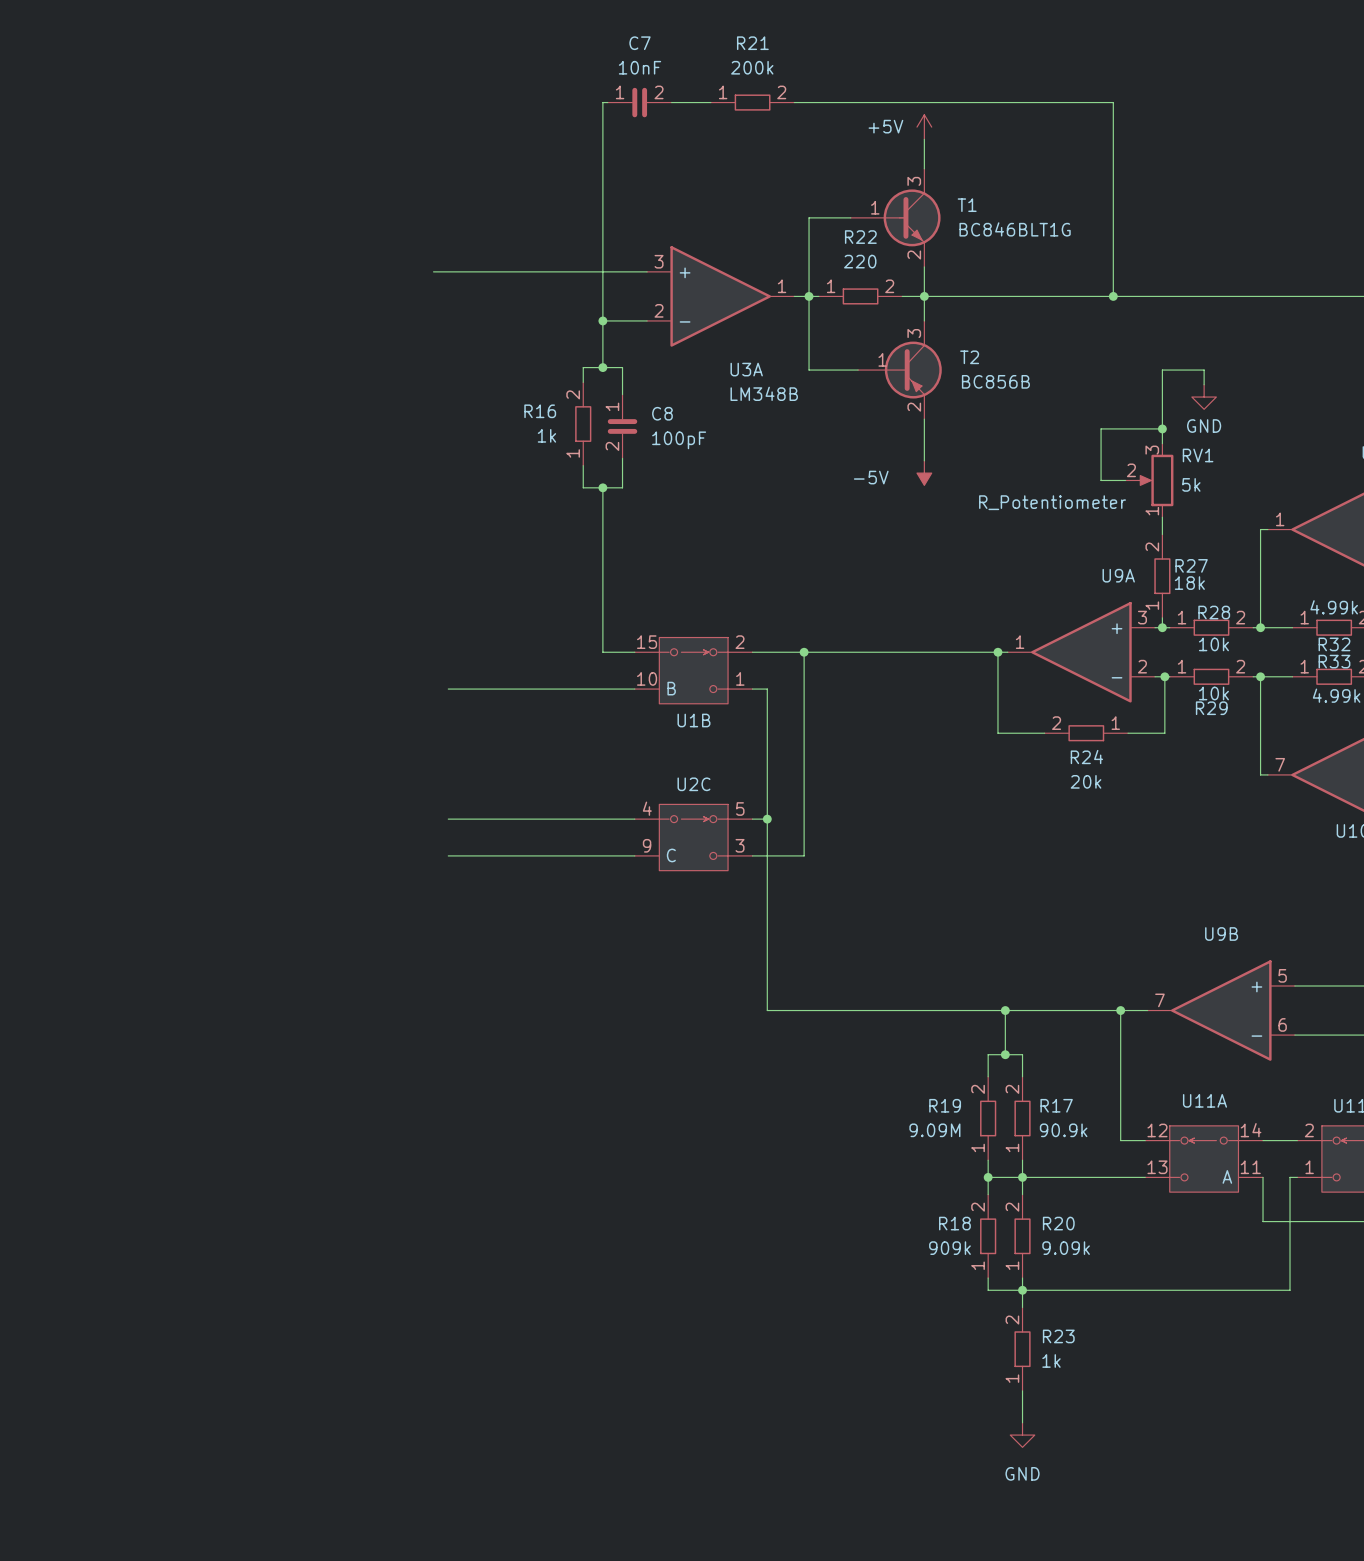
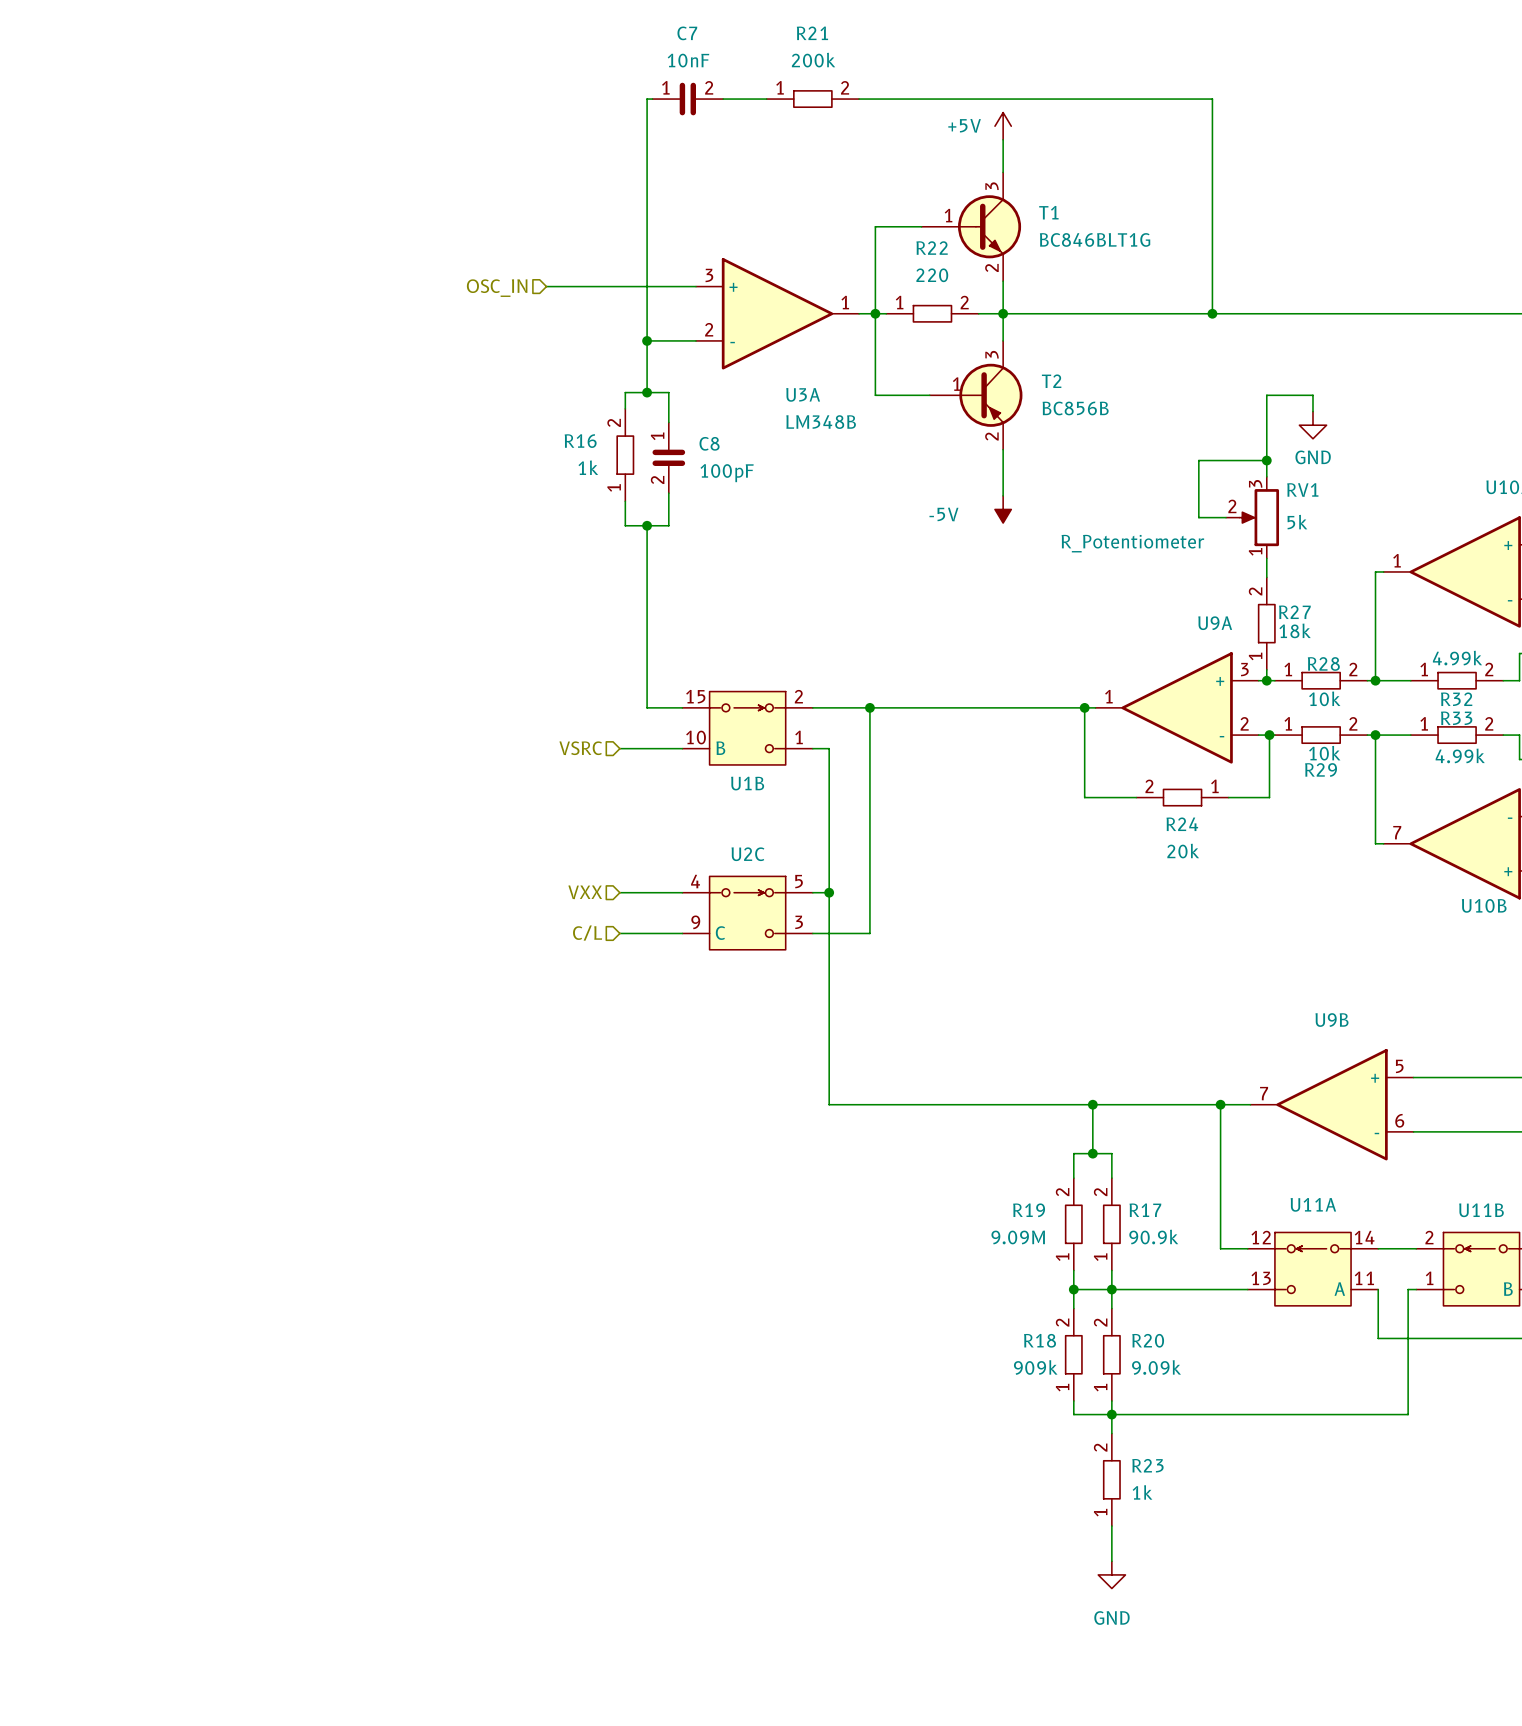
wire: (433, 271) (512, 271) -> none
hierarchical label: none -> OSC_IN (497, 288)
hierarchical label: none -> VSRC (580, 748)
wire: (448, 689) (578, 689) -> none
hierarchical label: none -> VXX (585, 892)
wire: (448, 819) (578, 819) -> none
wire: (448, 855) (578, 855) -> none
hierarchical label: none -> C/L (587, 933)

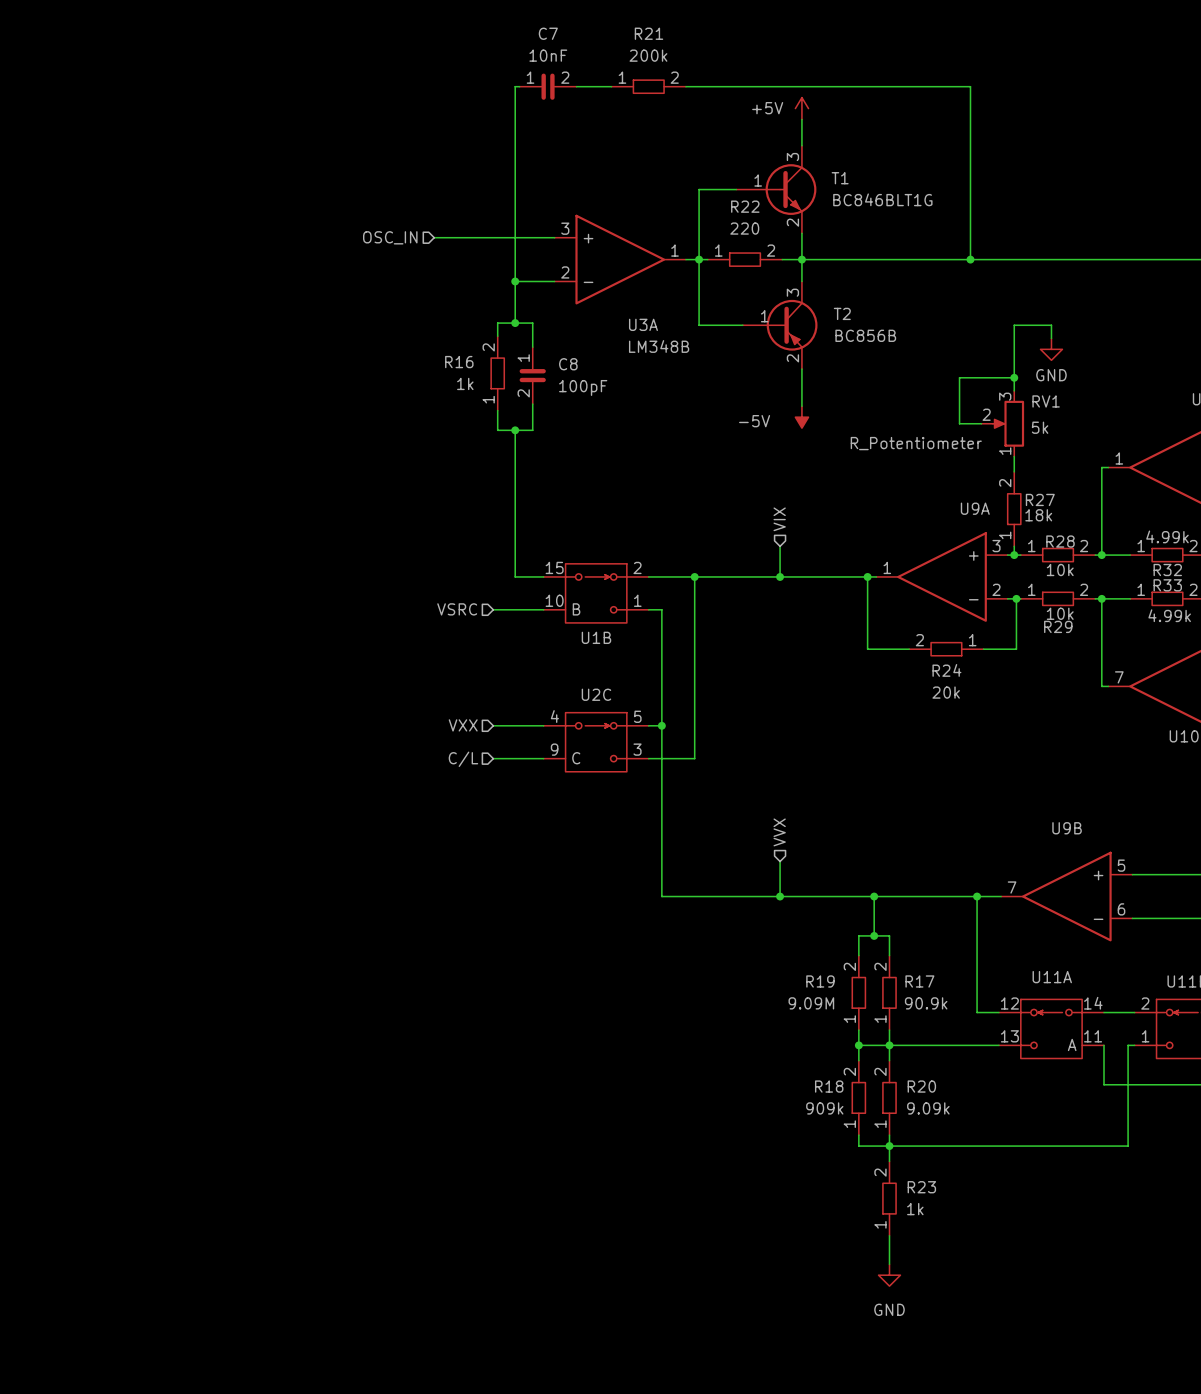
hierarchical label: none -> VIX (779, 519)
wire: none -> (780, 546) (780, 576)
junction: none -> (780, 576)
hierarchical label: none -> VVX (779, 832)
wire: none -> (780, 861) (780, 896)
junction: none -> (780, 896)

